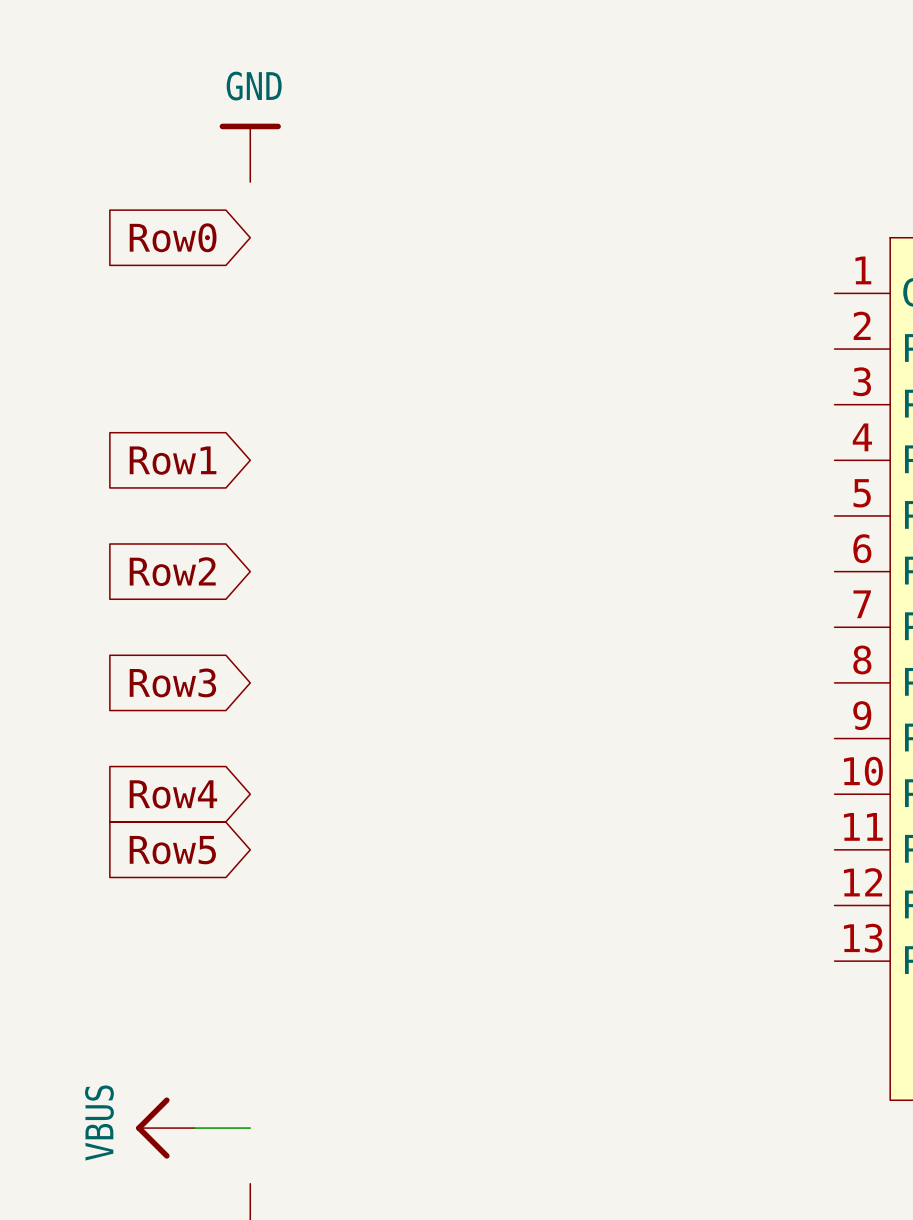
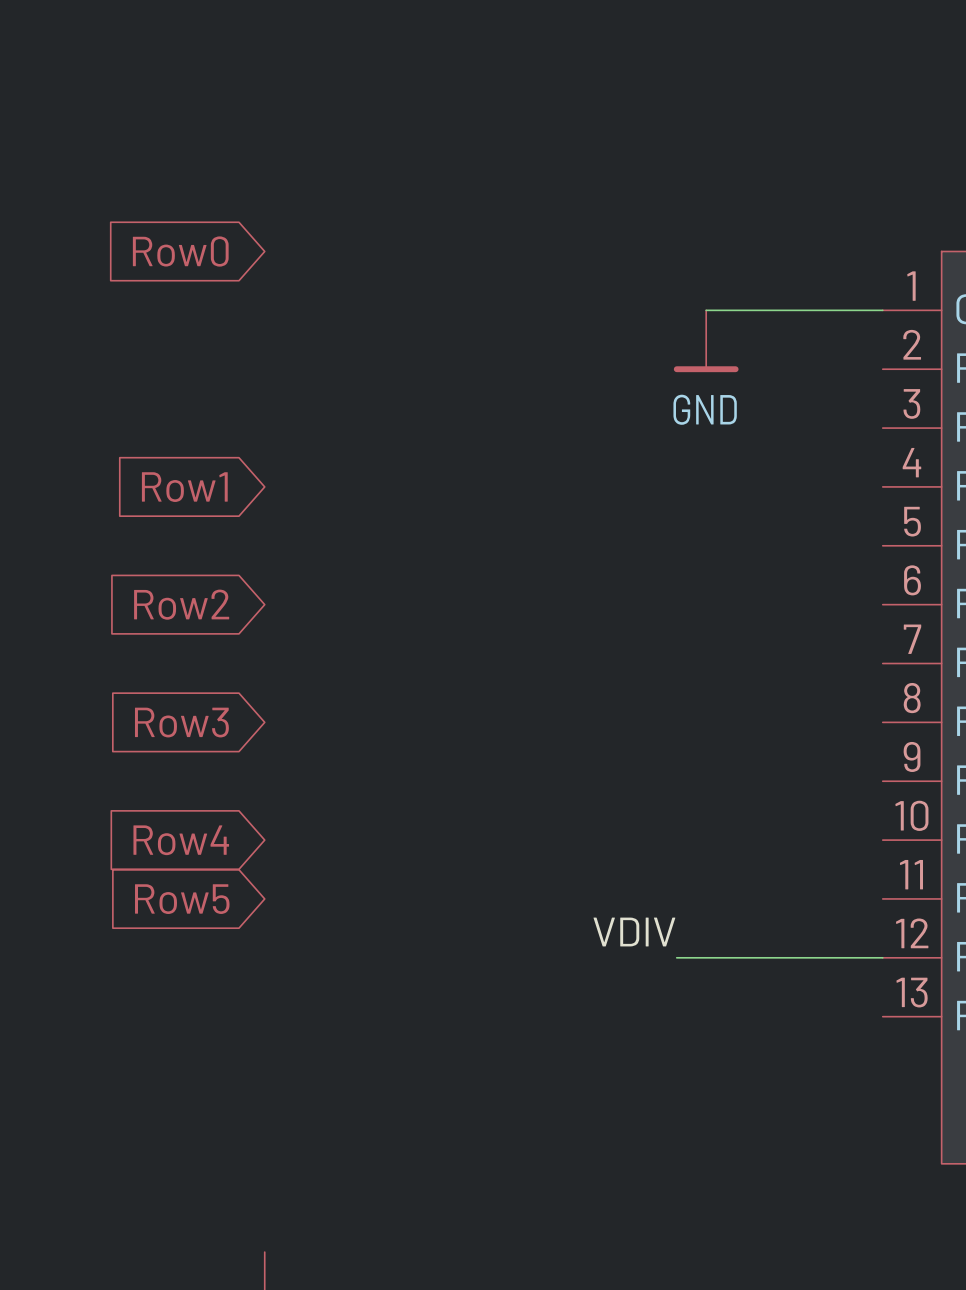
power symbol rotation: 0° (250, 126) -> 180° (706, 369)
power symbol position: GND (250, 152) -> GND (706, 341)
wire: none -> (706, 310) (882, 310)
label: none -> VDIV (634, 932)
wire: none -> (676, 957) (882, 957)
power symbol: VBUS (165, 1128) -> none
wire: (194, 1128) (250, 1128) -> none

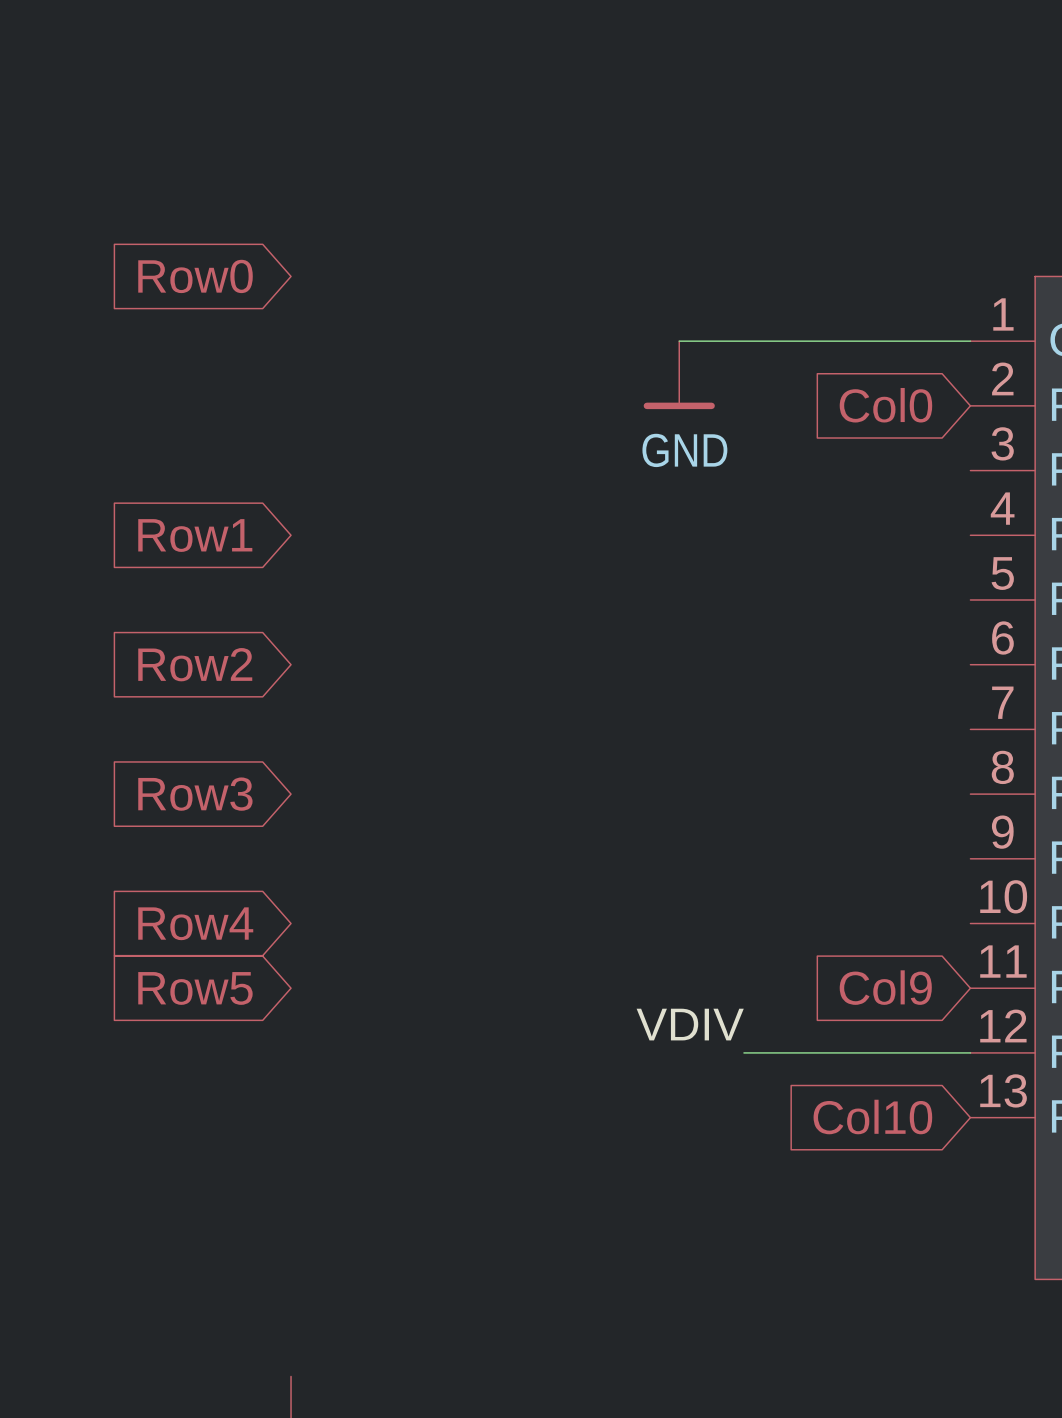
wire: none -> (679, 341) (776, 341)
power symbol position: GND (706, 341) -> GND (679, 375)
global label: none -> Col0 (885, 405)
global label: none -> Col9 (885, 987)
global label: none -> Col10 (872, 1117)

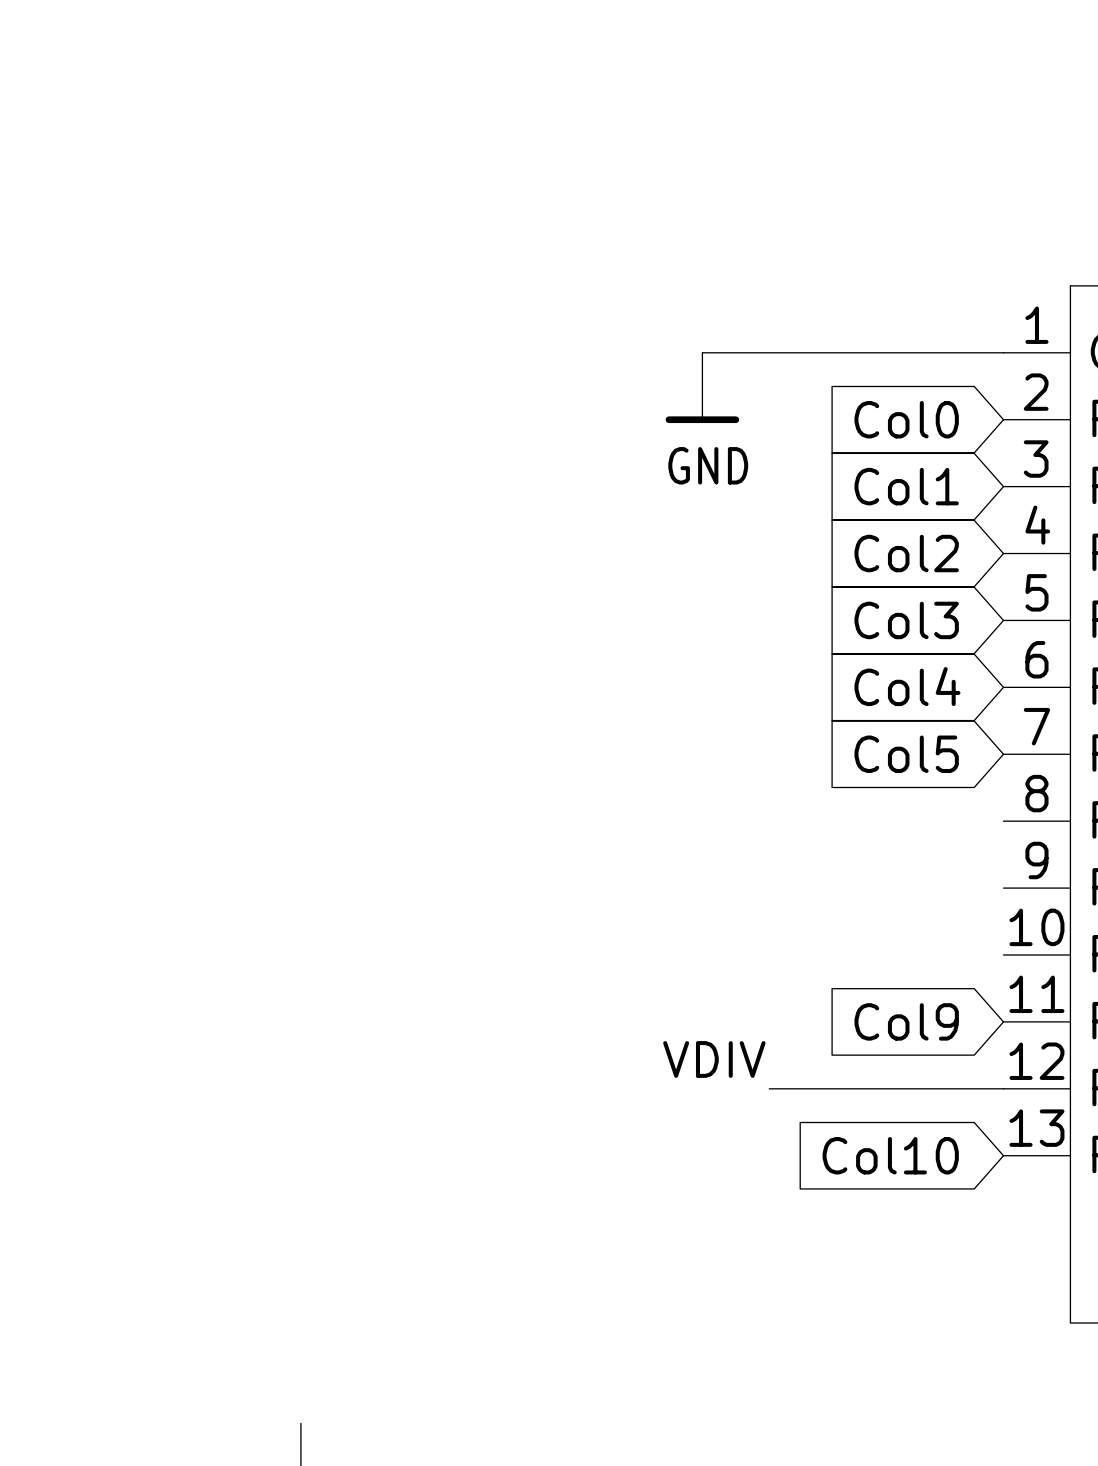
global label: Row0 (195, 276) -> none
global label: none -> Col1 (906, 486)
global label: none -> Col2 (906, 553)
global label: Row1 (195, 535) -> none
global label: none -> Col3 (906, 620)
global label: Row2 (195, 664) -> none
global label: none -> Col4 (907, 686)
global label: none -> Col5 (906, 754)
global label: Row3 (195, 794) -> none
global label: Row4 (195, 923) -> none
global label: Row5 (195, 988) -> none

